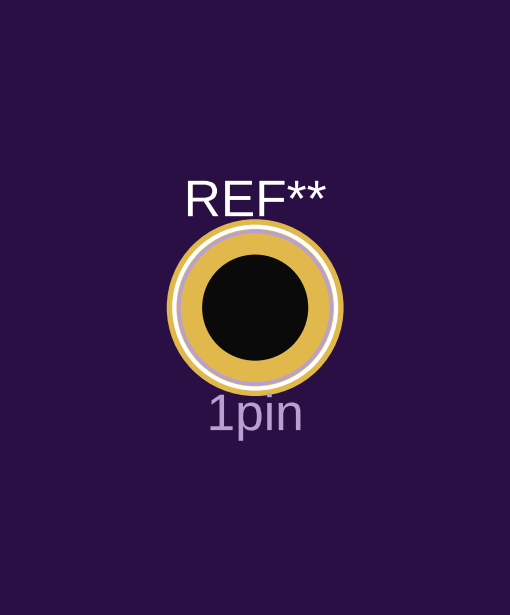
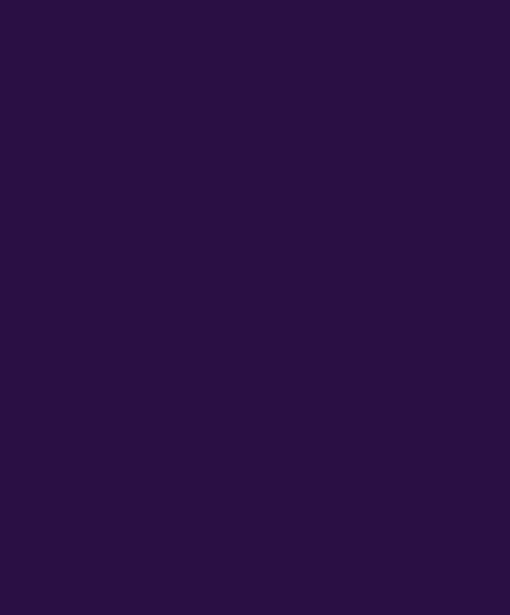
REF**: 1pin (255, 307) -> none

